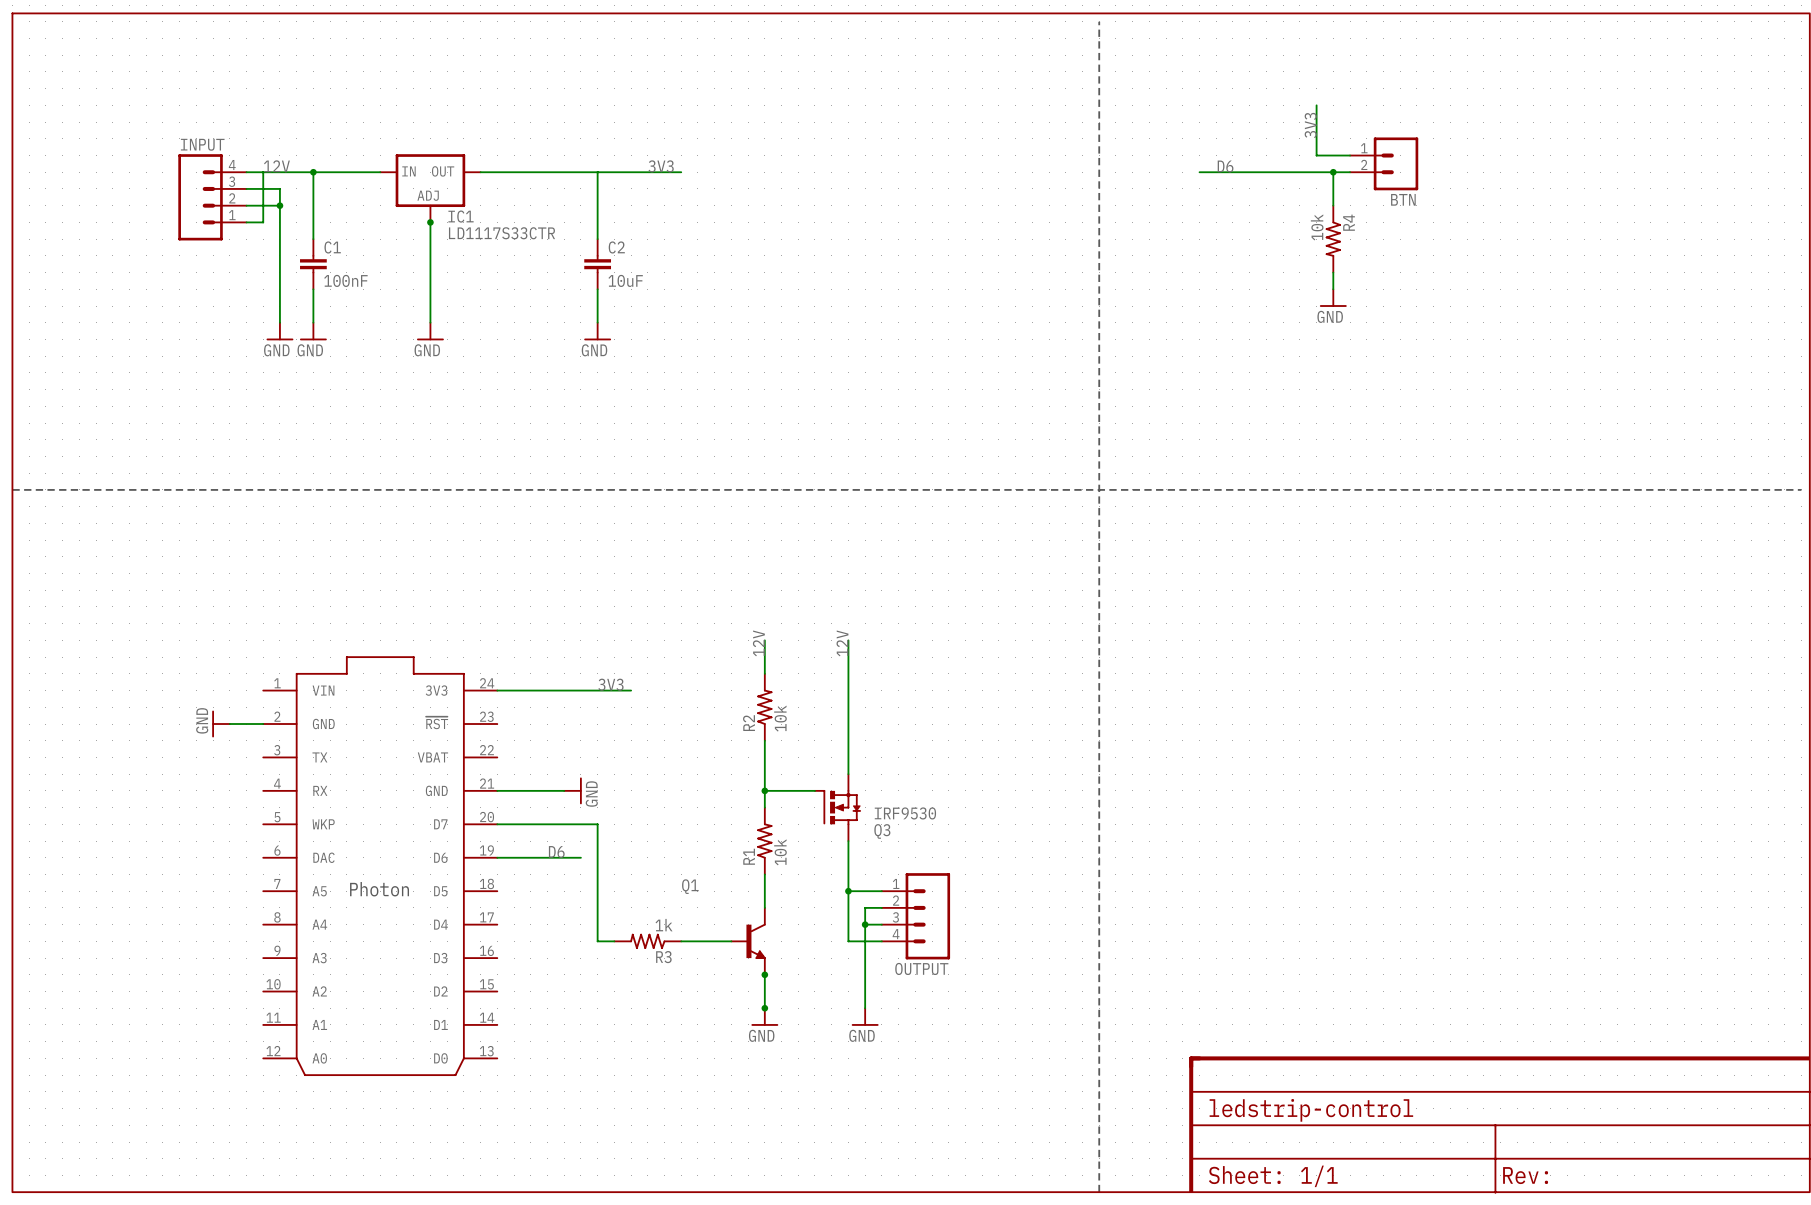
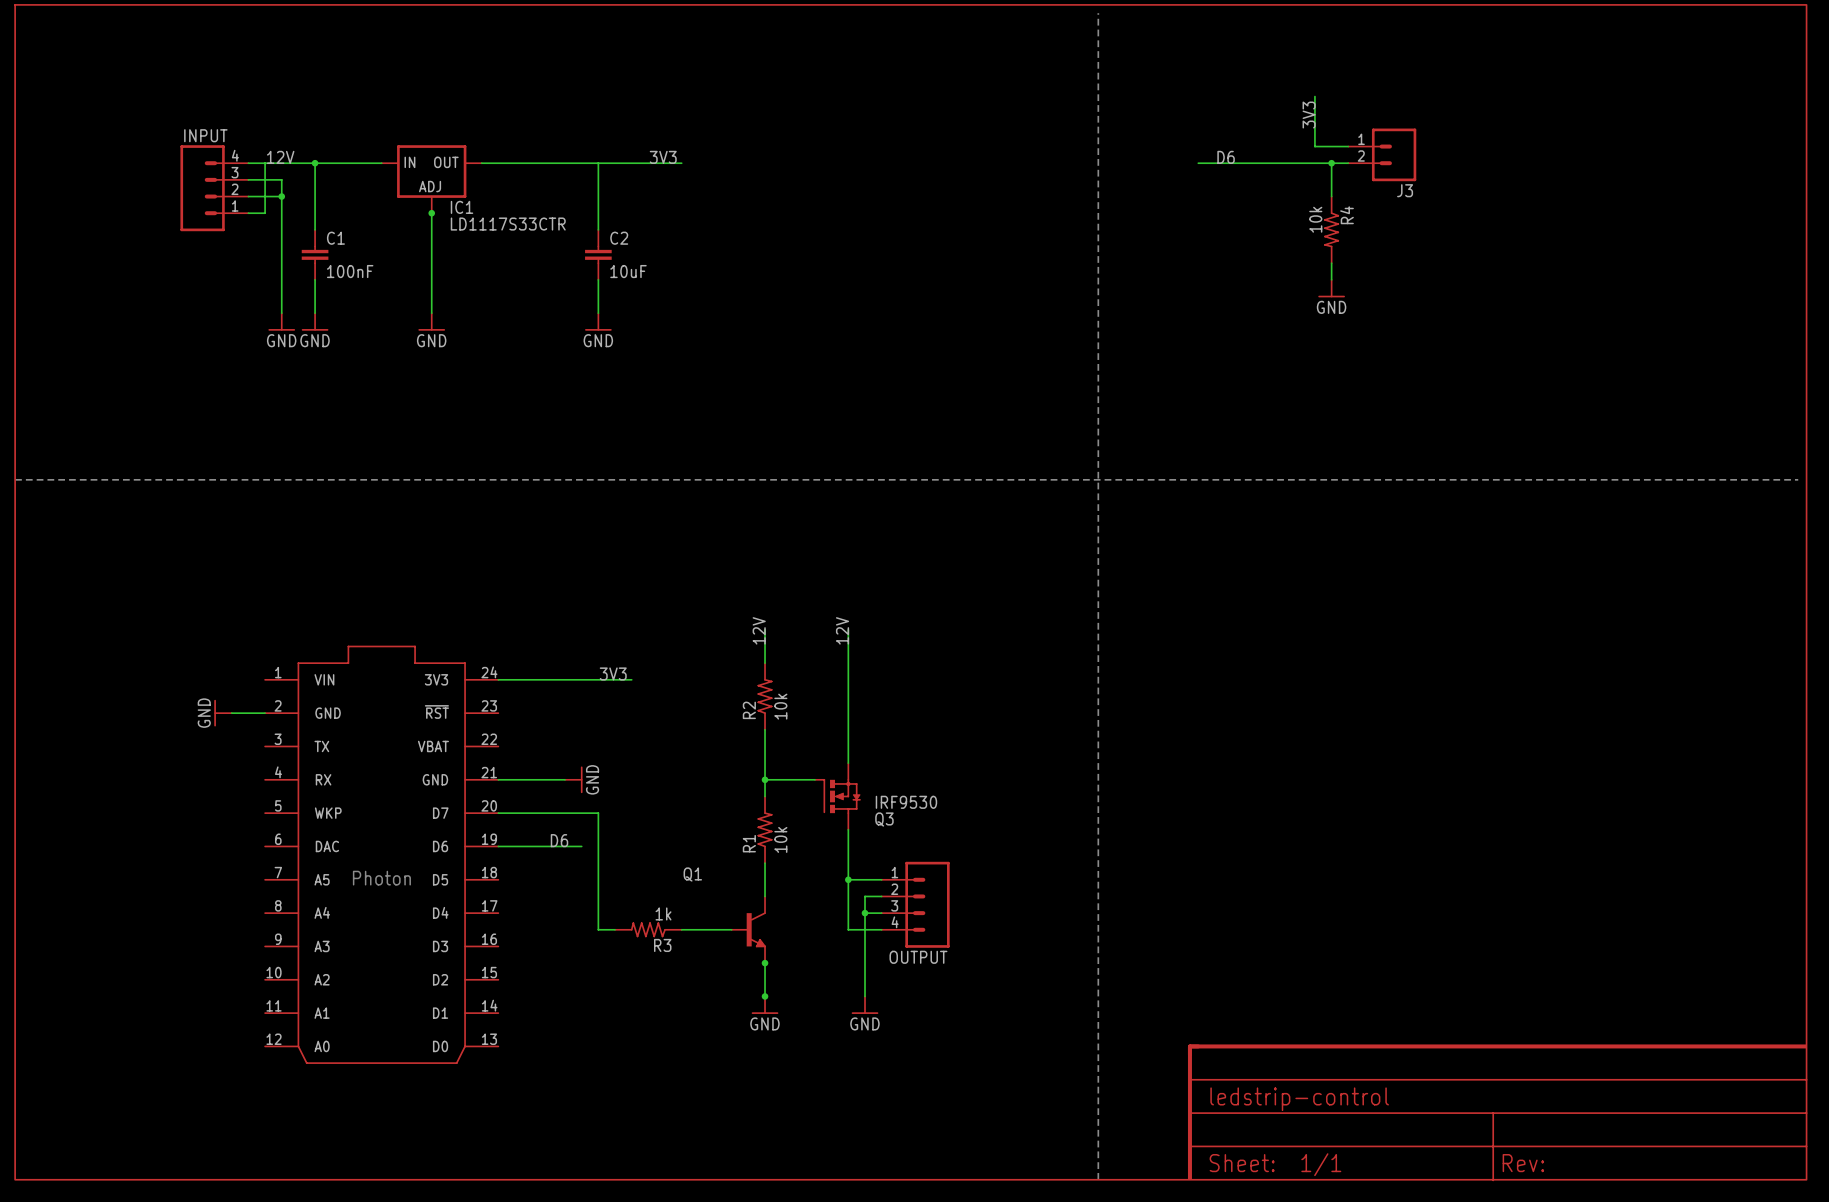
BTN name: BTN (1403, 199) -> J3 (1405, 190)

